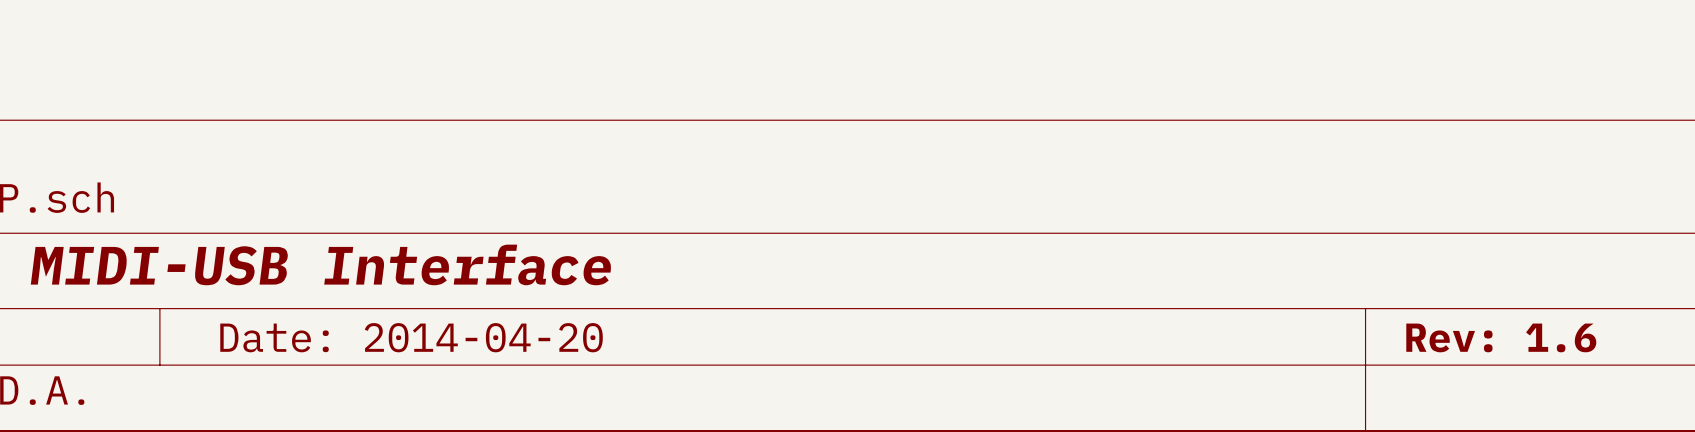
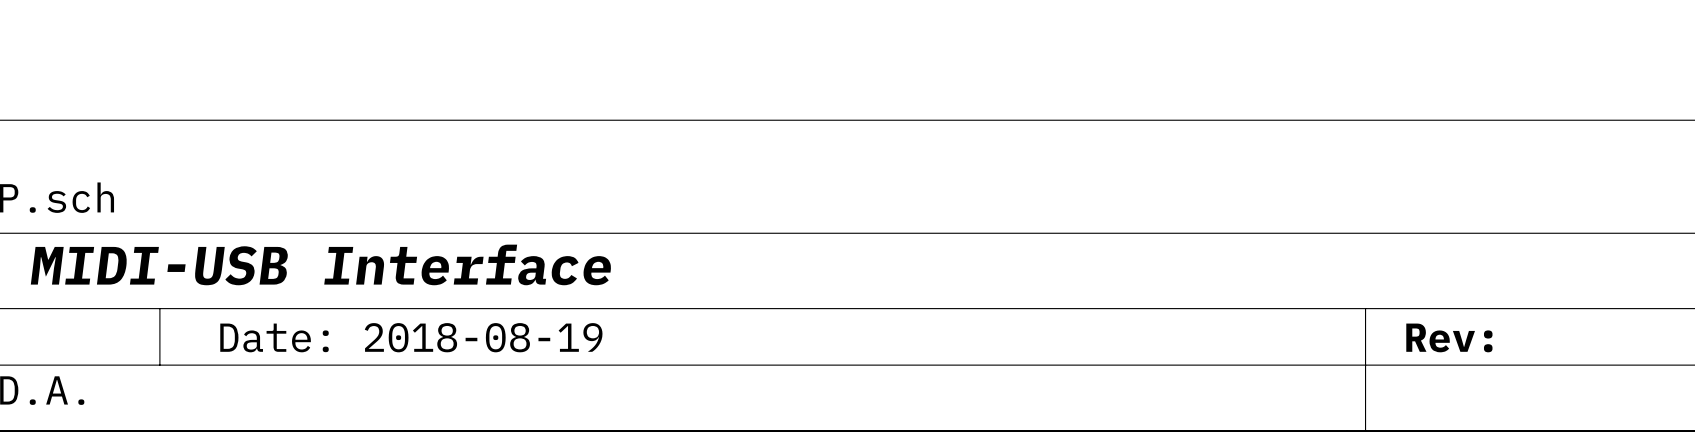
title block: Date: 2014-04-20 (411, 337) -> Date: 2018-08-19 (411, 337)
title block: Rev: 1.6 (1501, 337) -> Rev: (1449, 337)

